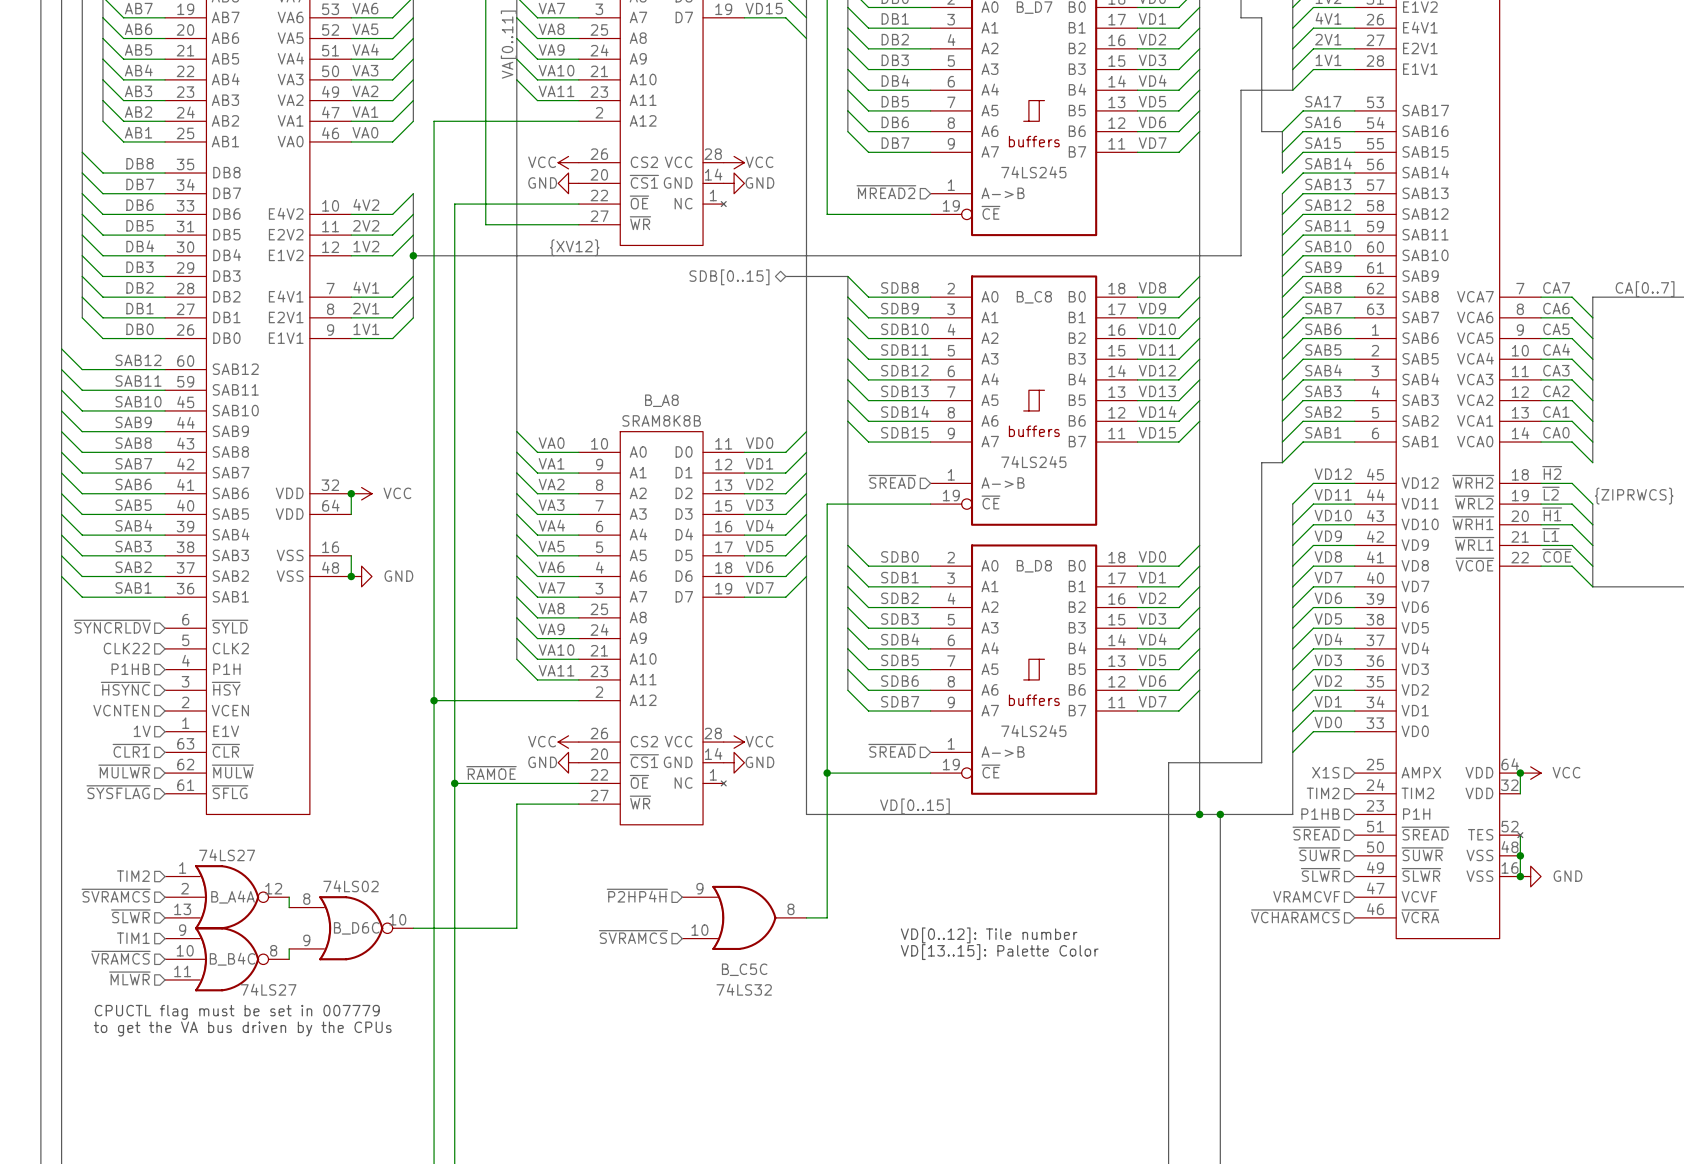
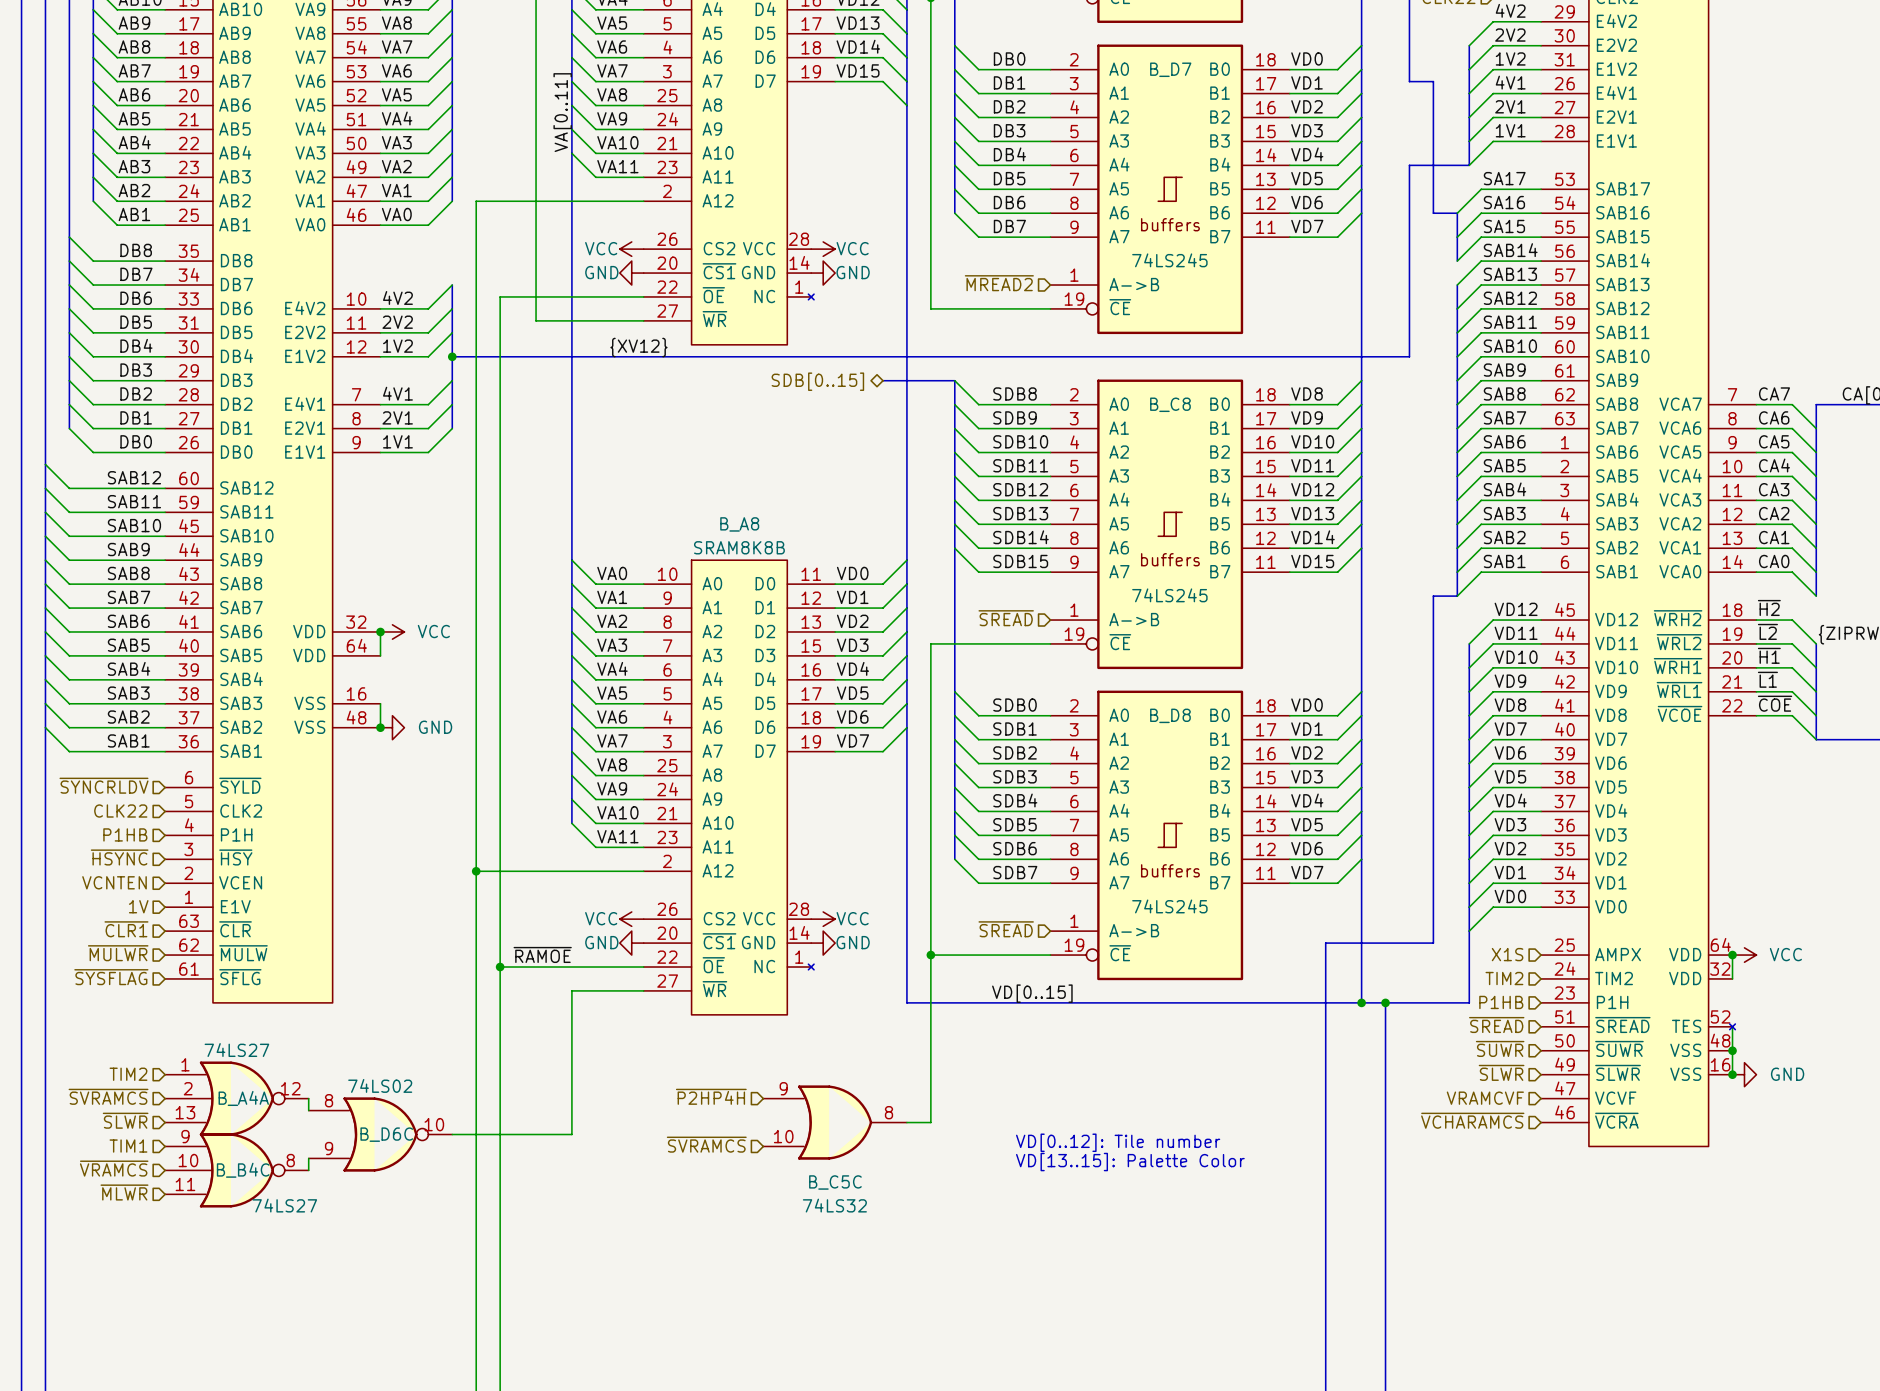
text: CPUCTL flag must be set in 007779 (237, 1012) -> none
text: to get the VA bus driven by the CPUs (242, 1029) -> none

